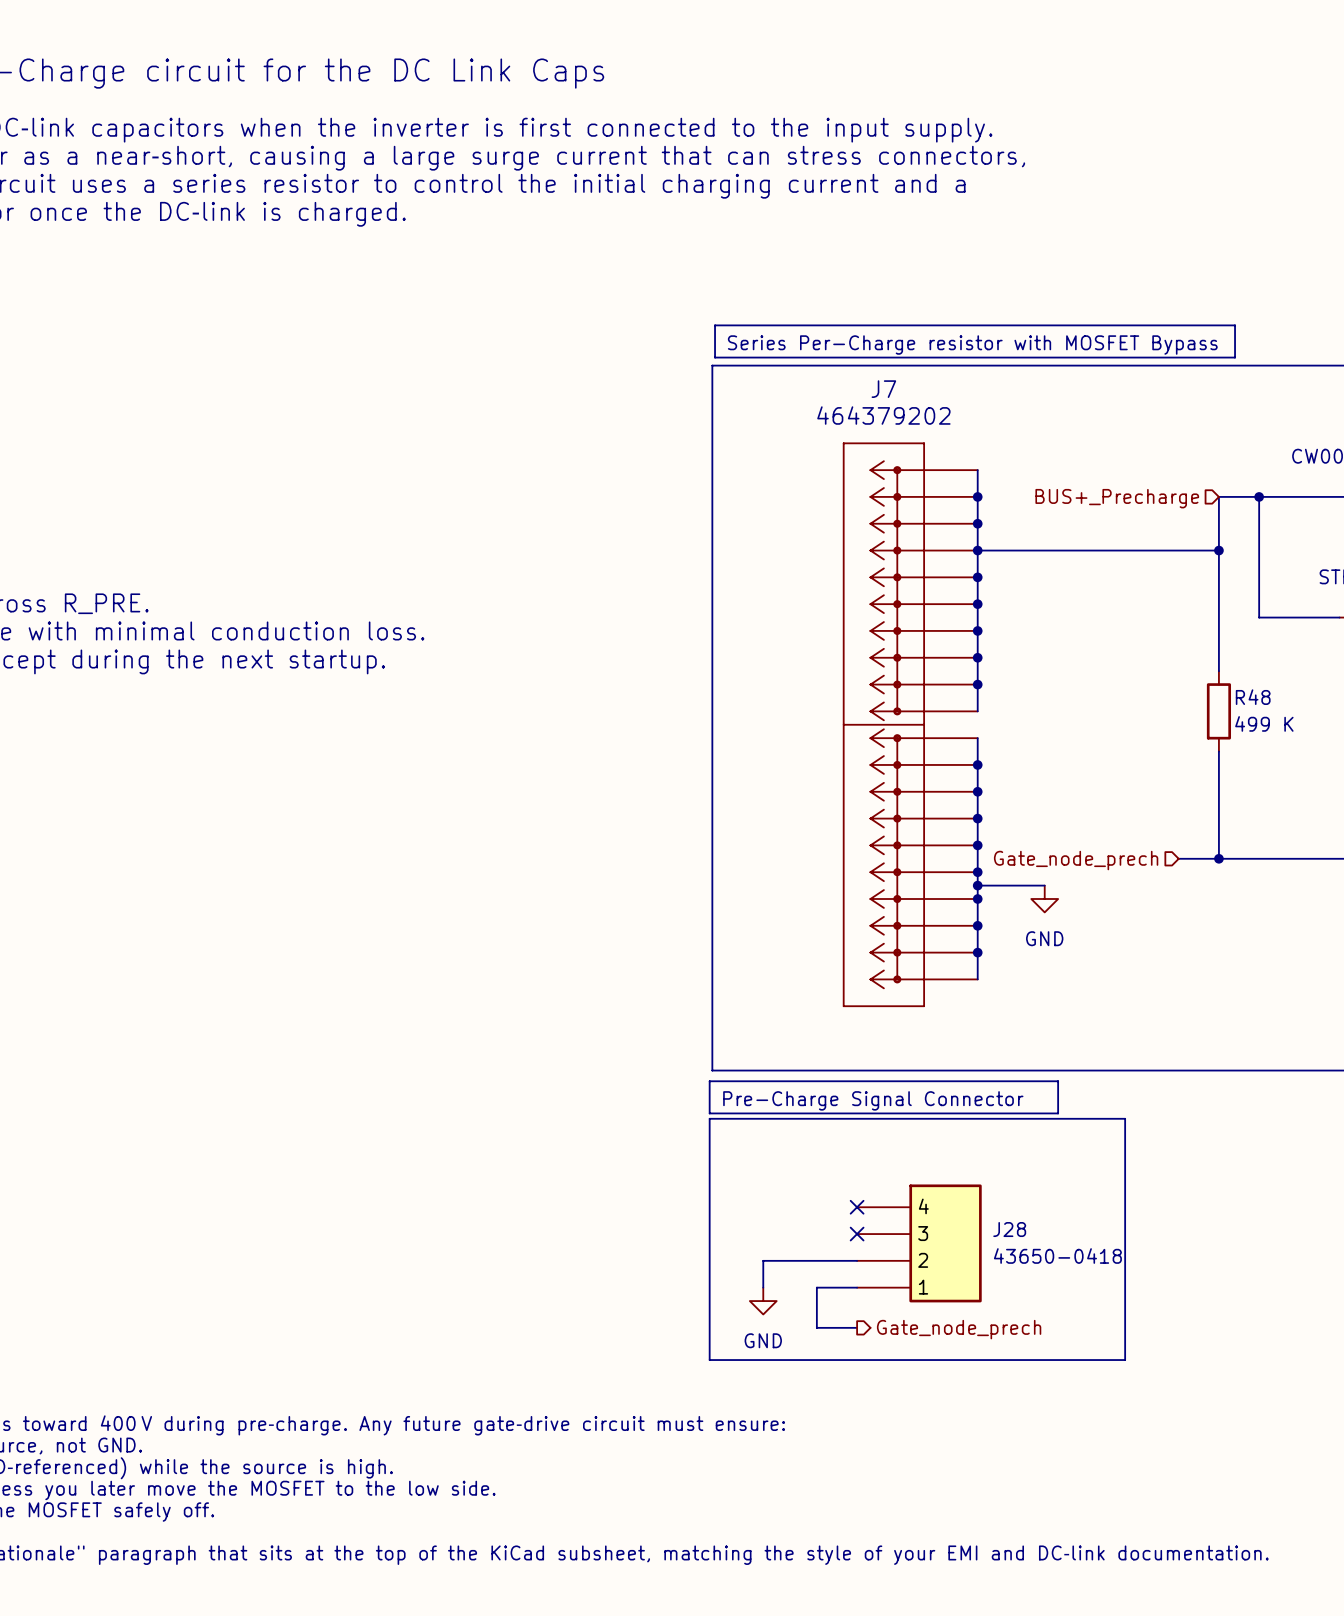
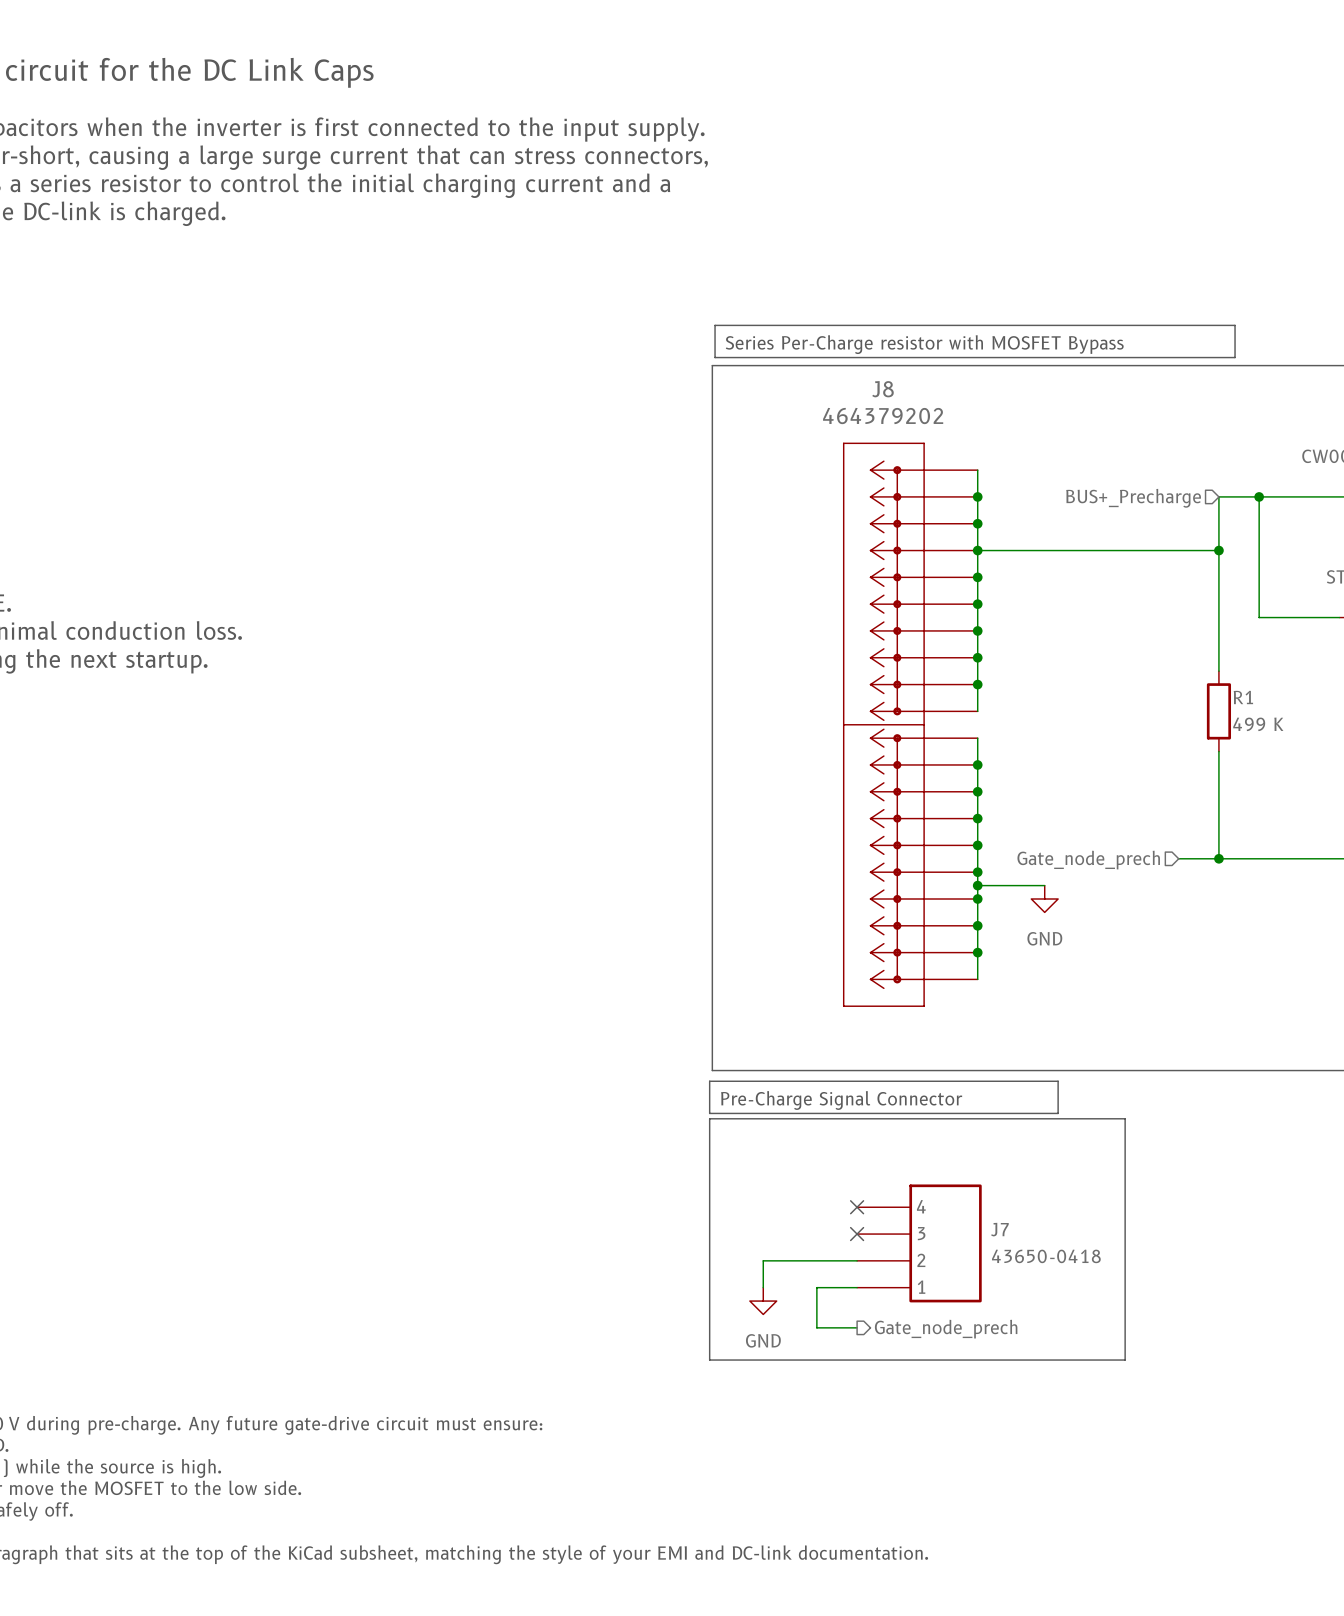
J7 name: J7 (883, 389) -> J8 (883, 389)
R48 name: R48 (1253, 697) -> R1 (1243, 697)
J28 name: J28 (1009, 1229) -> J7 (999, 1229)

